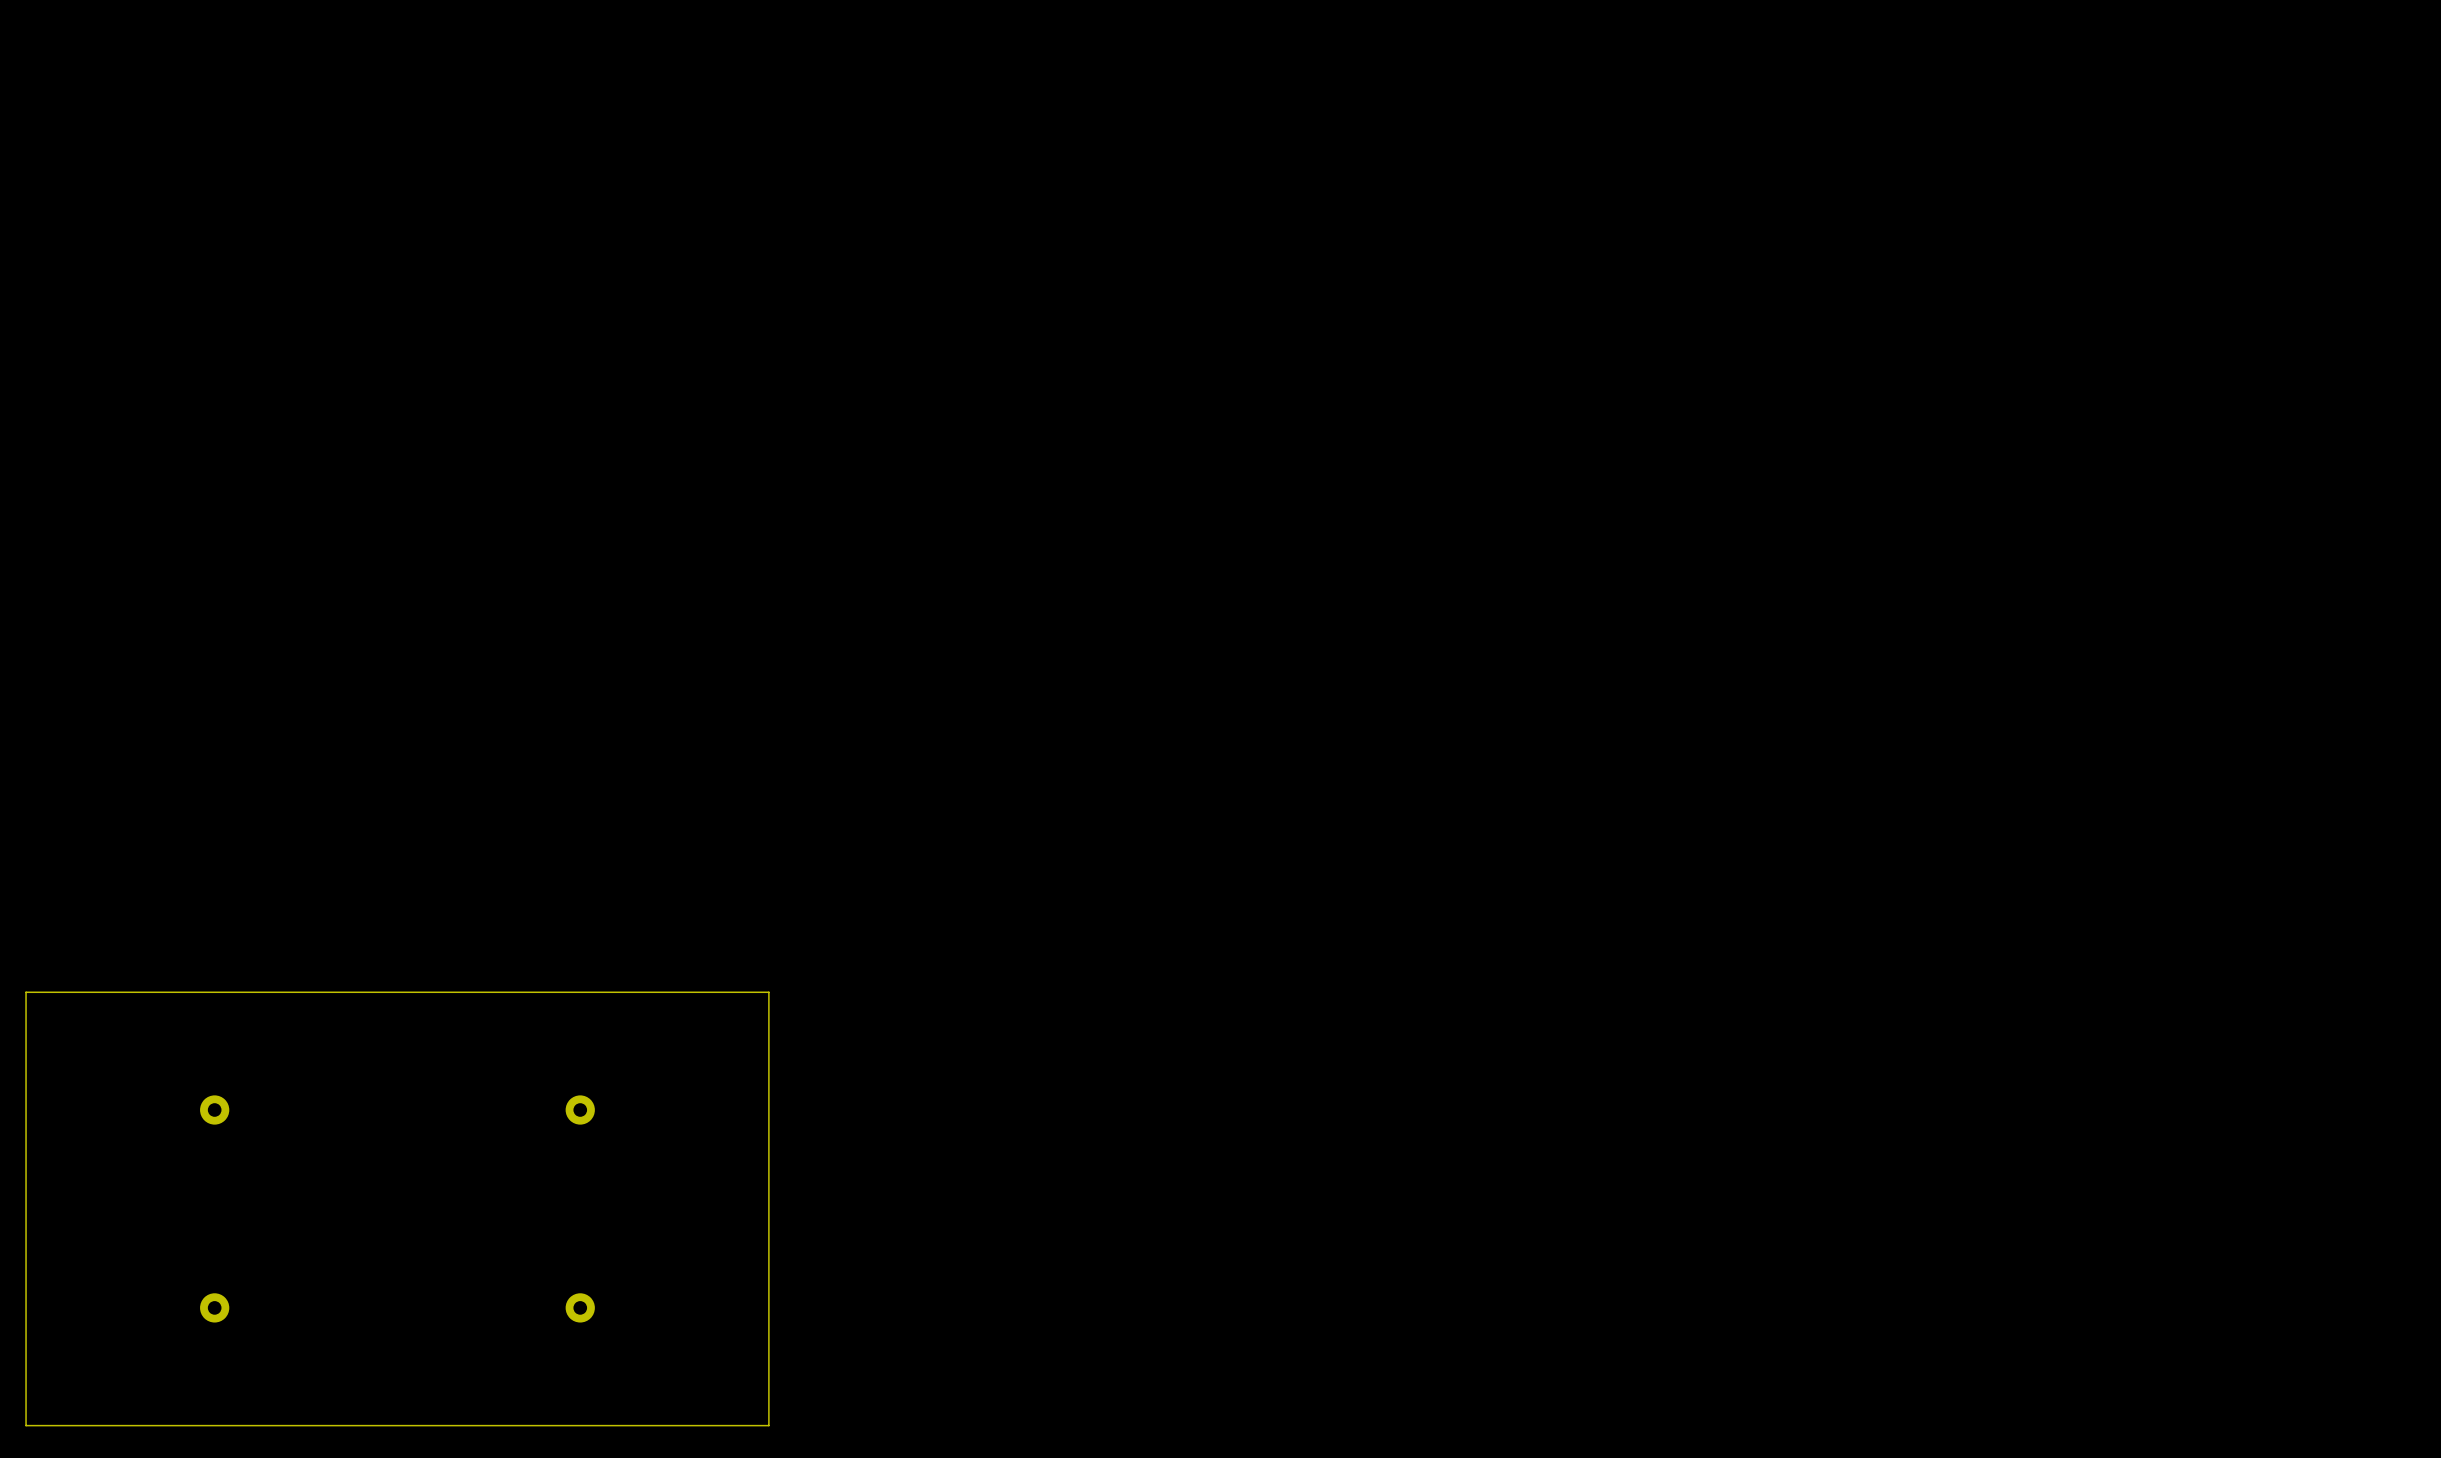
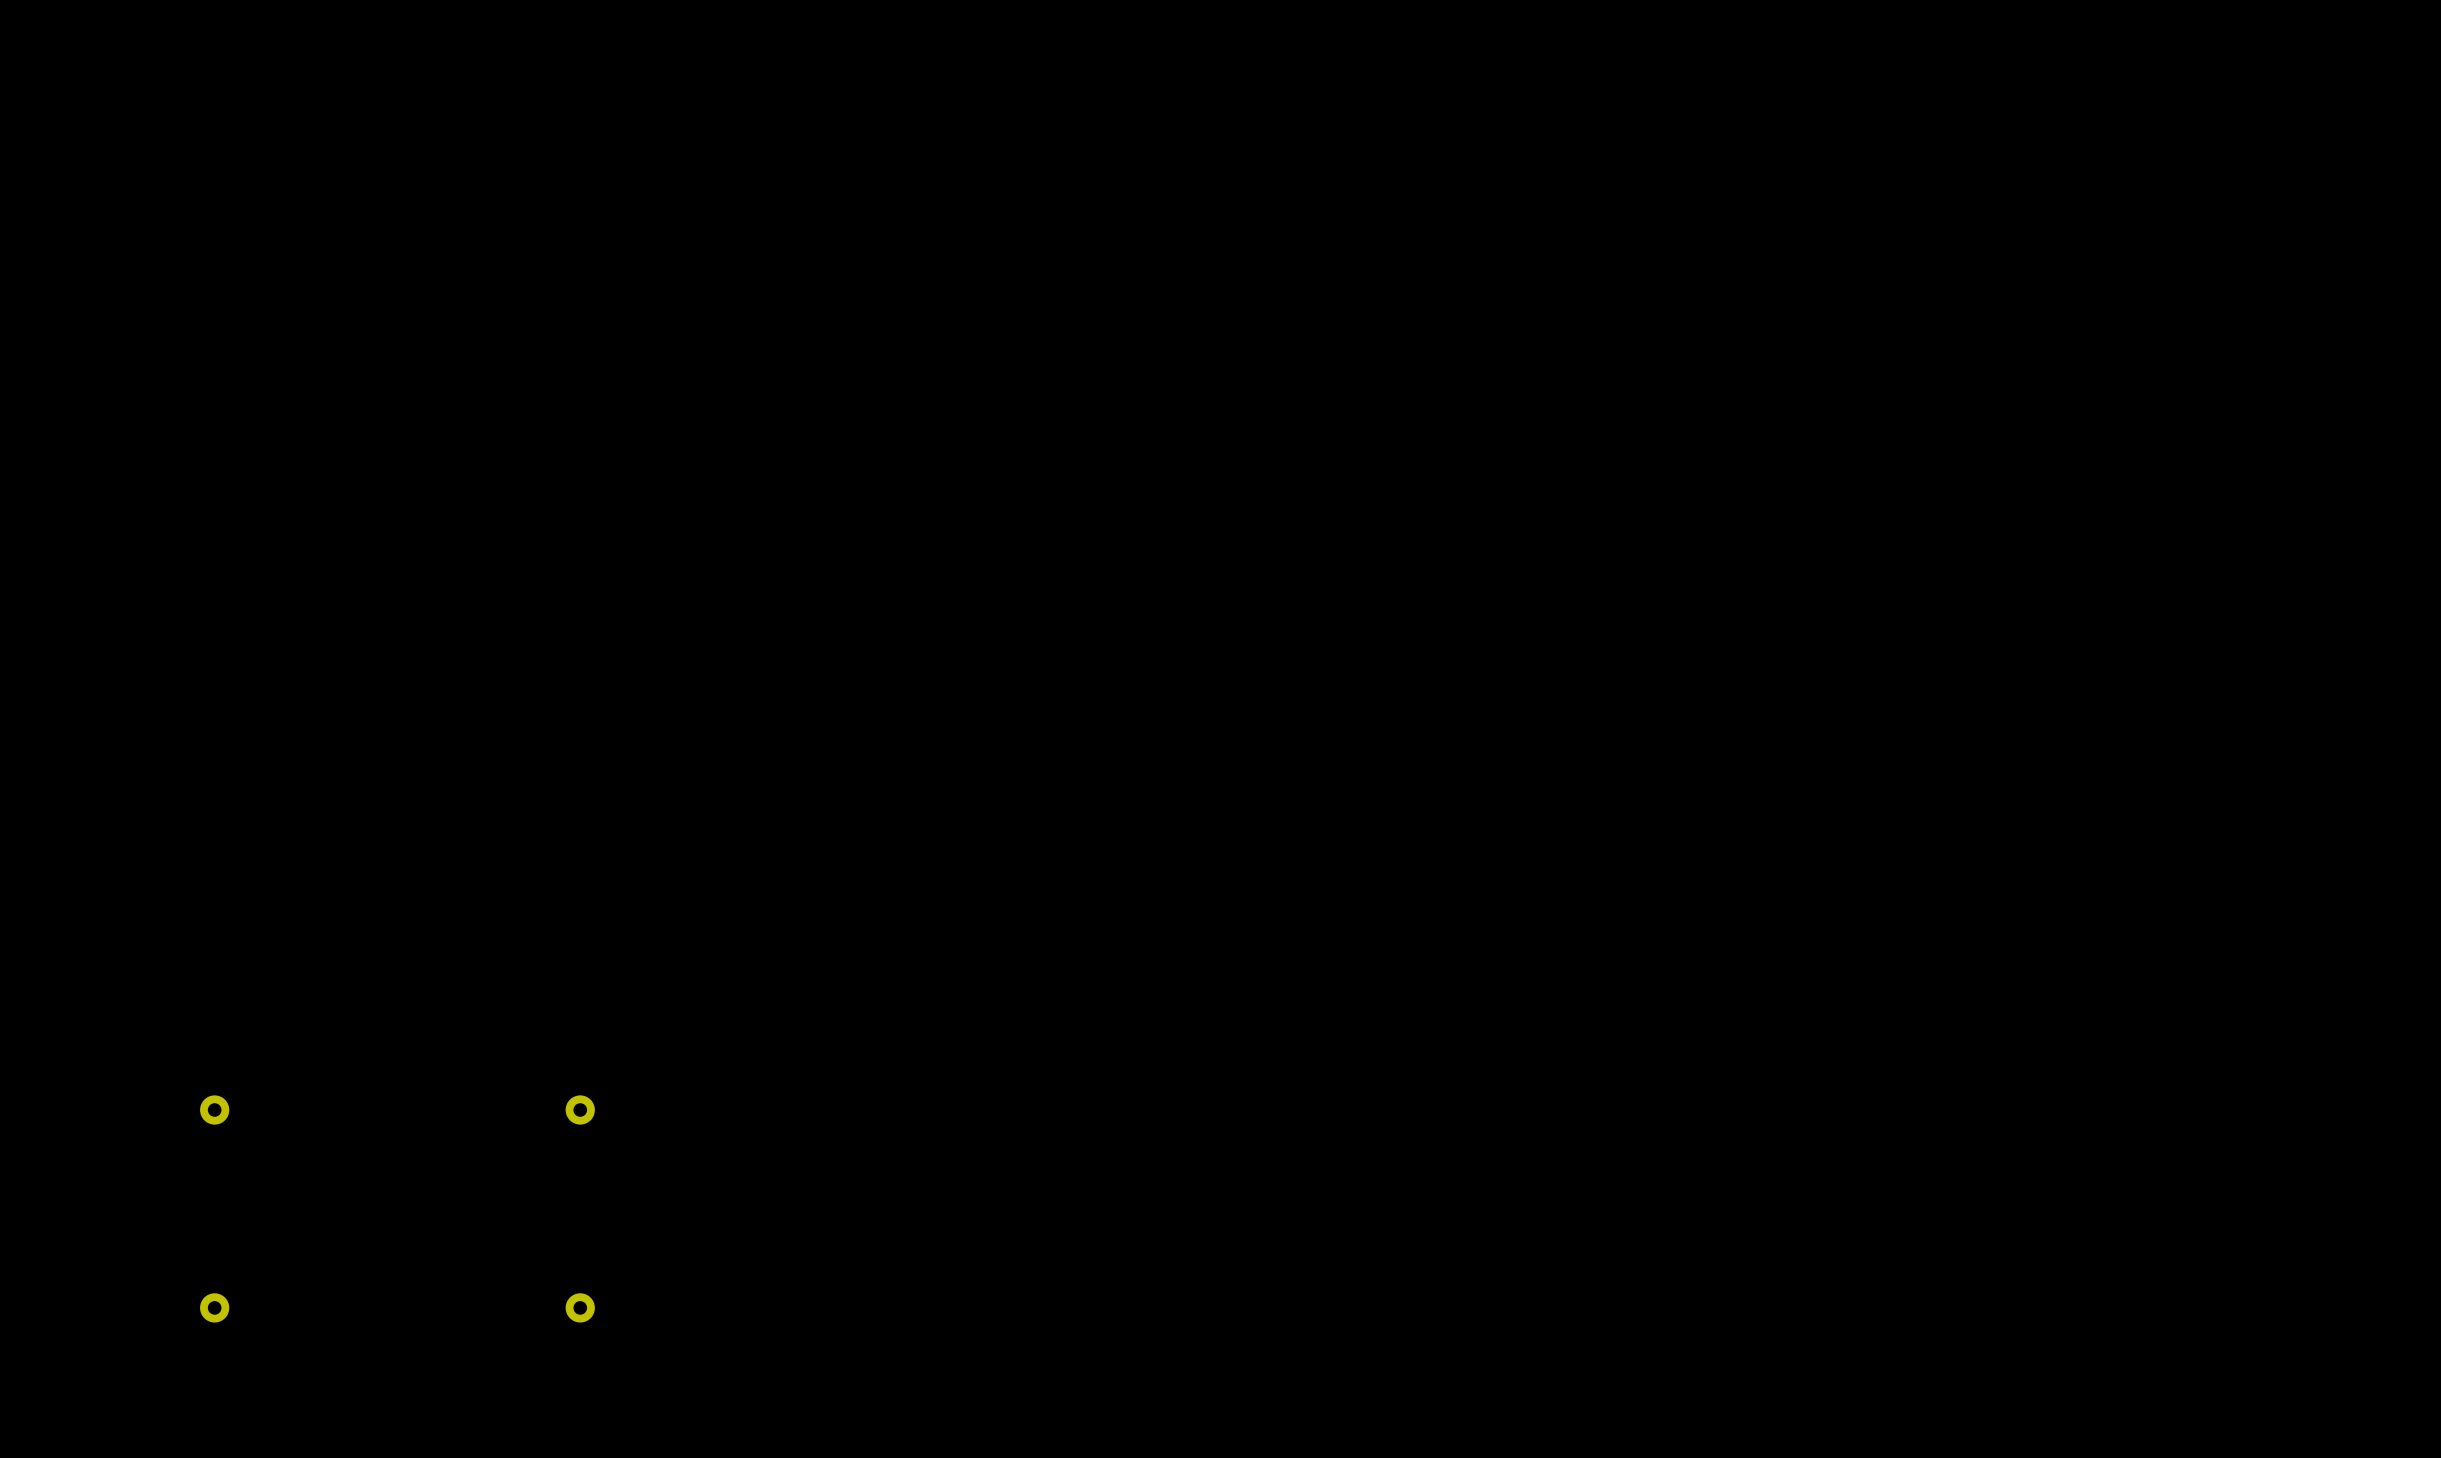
board edge: (768, 992) (26, 992) (26, 1425) (768, 1425) (768, 992) -> none

